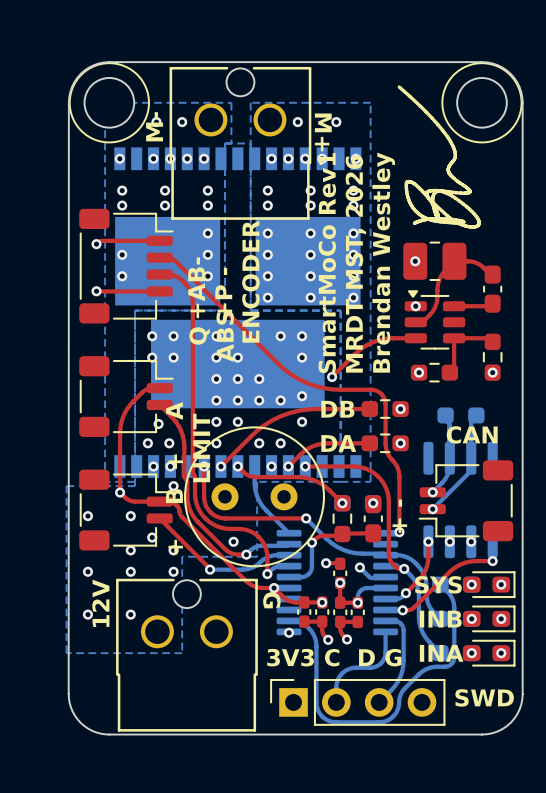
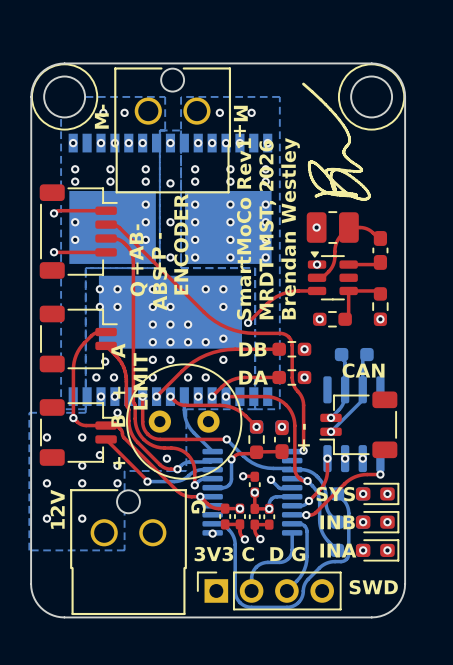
via: none -> (170, 143)
via: none -> (170, 183)
via: none -> (170, 222)
via: none -> (170, 257)

